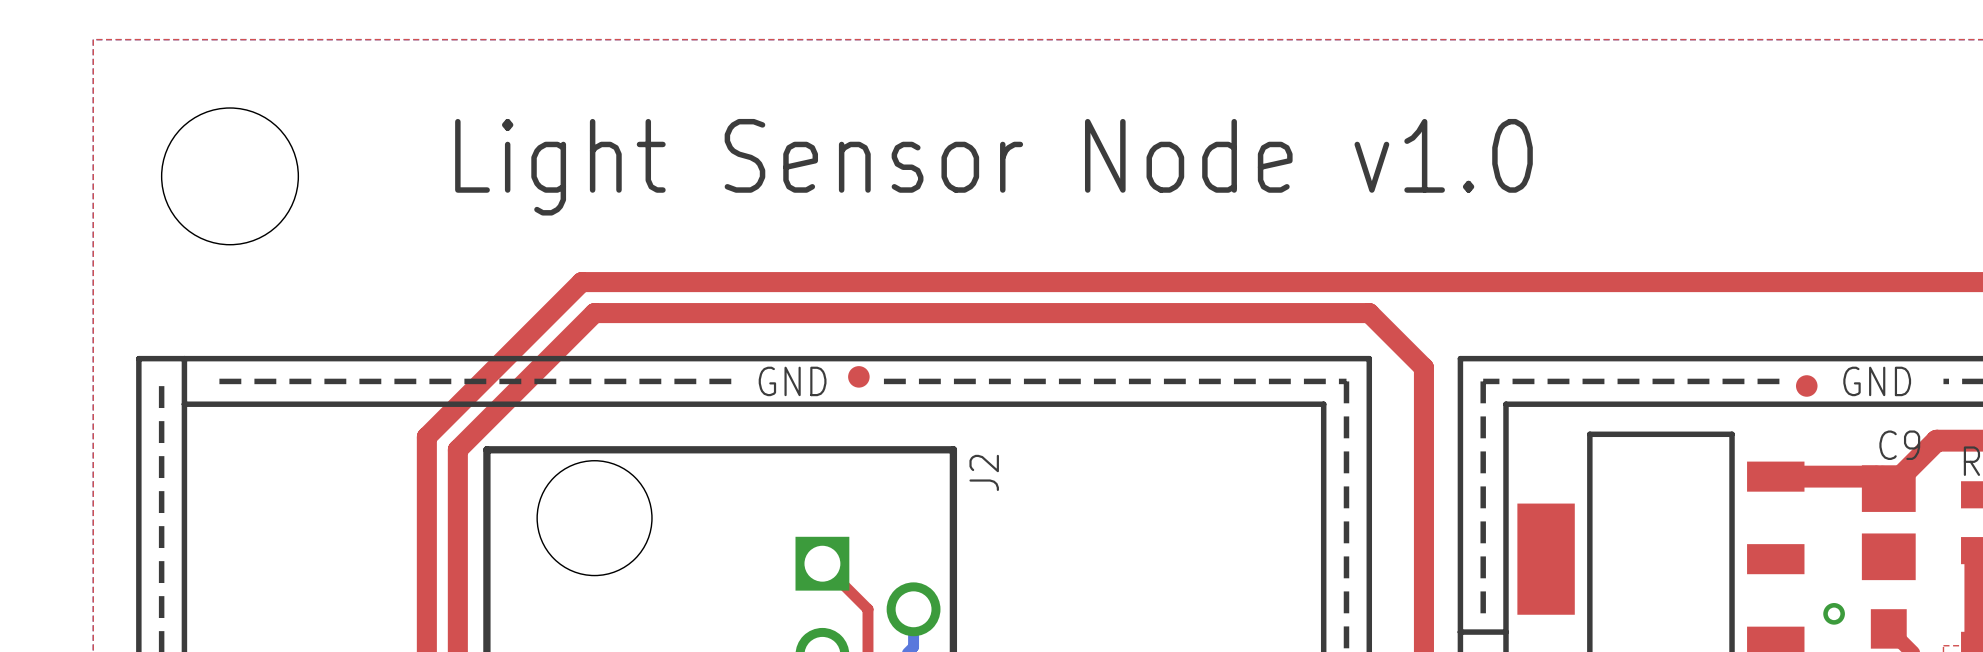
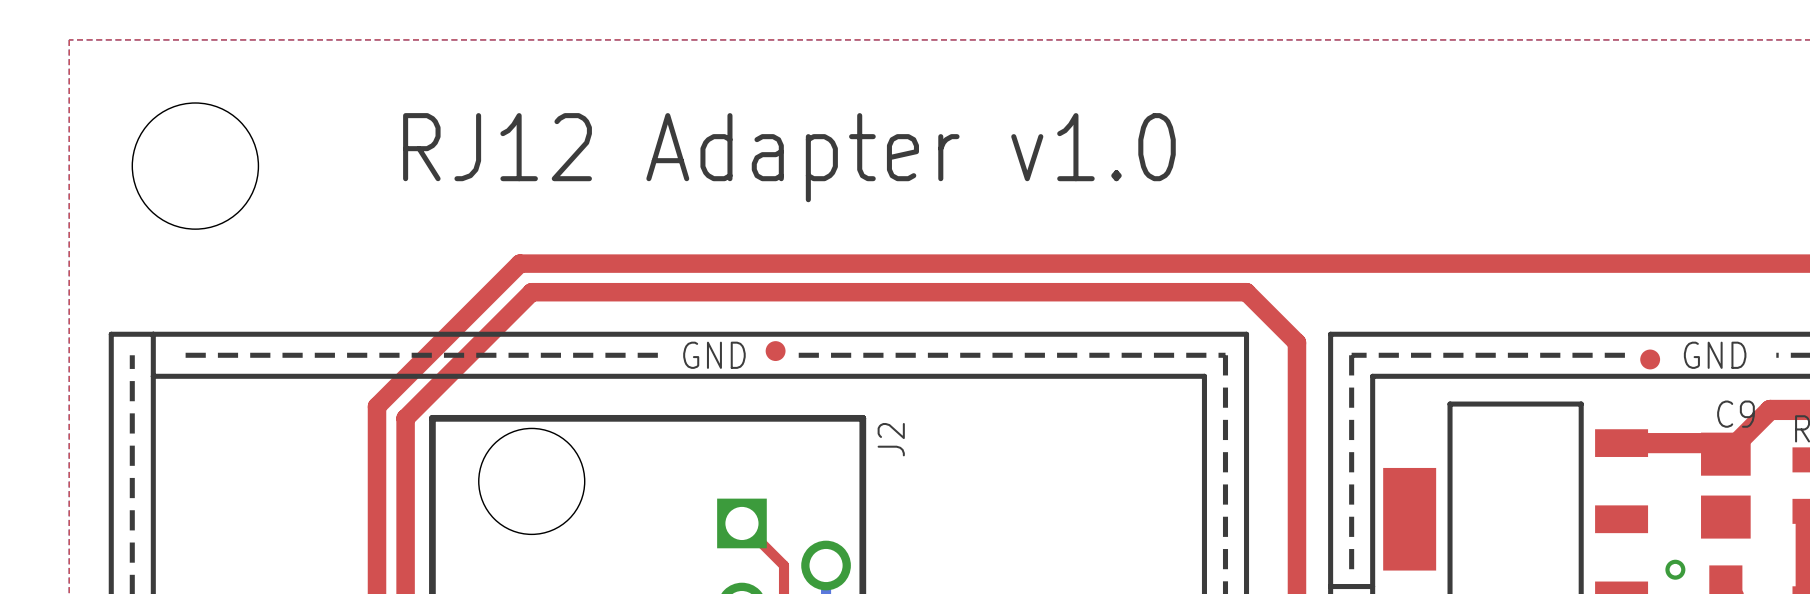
text: Light Sensor Node v1.0 (993, 167) -> RJ12 Adapter v1.0 (789, 157)

